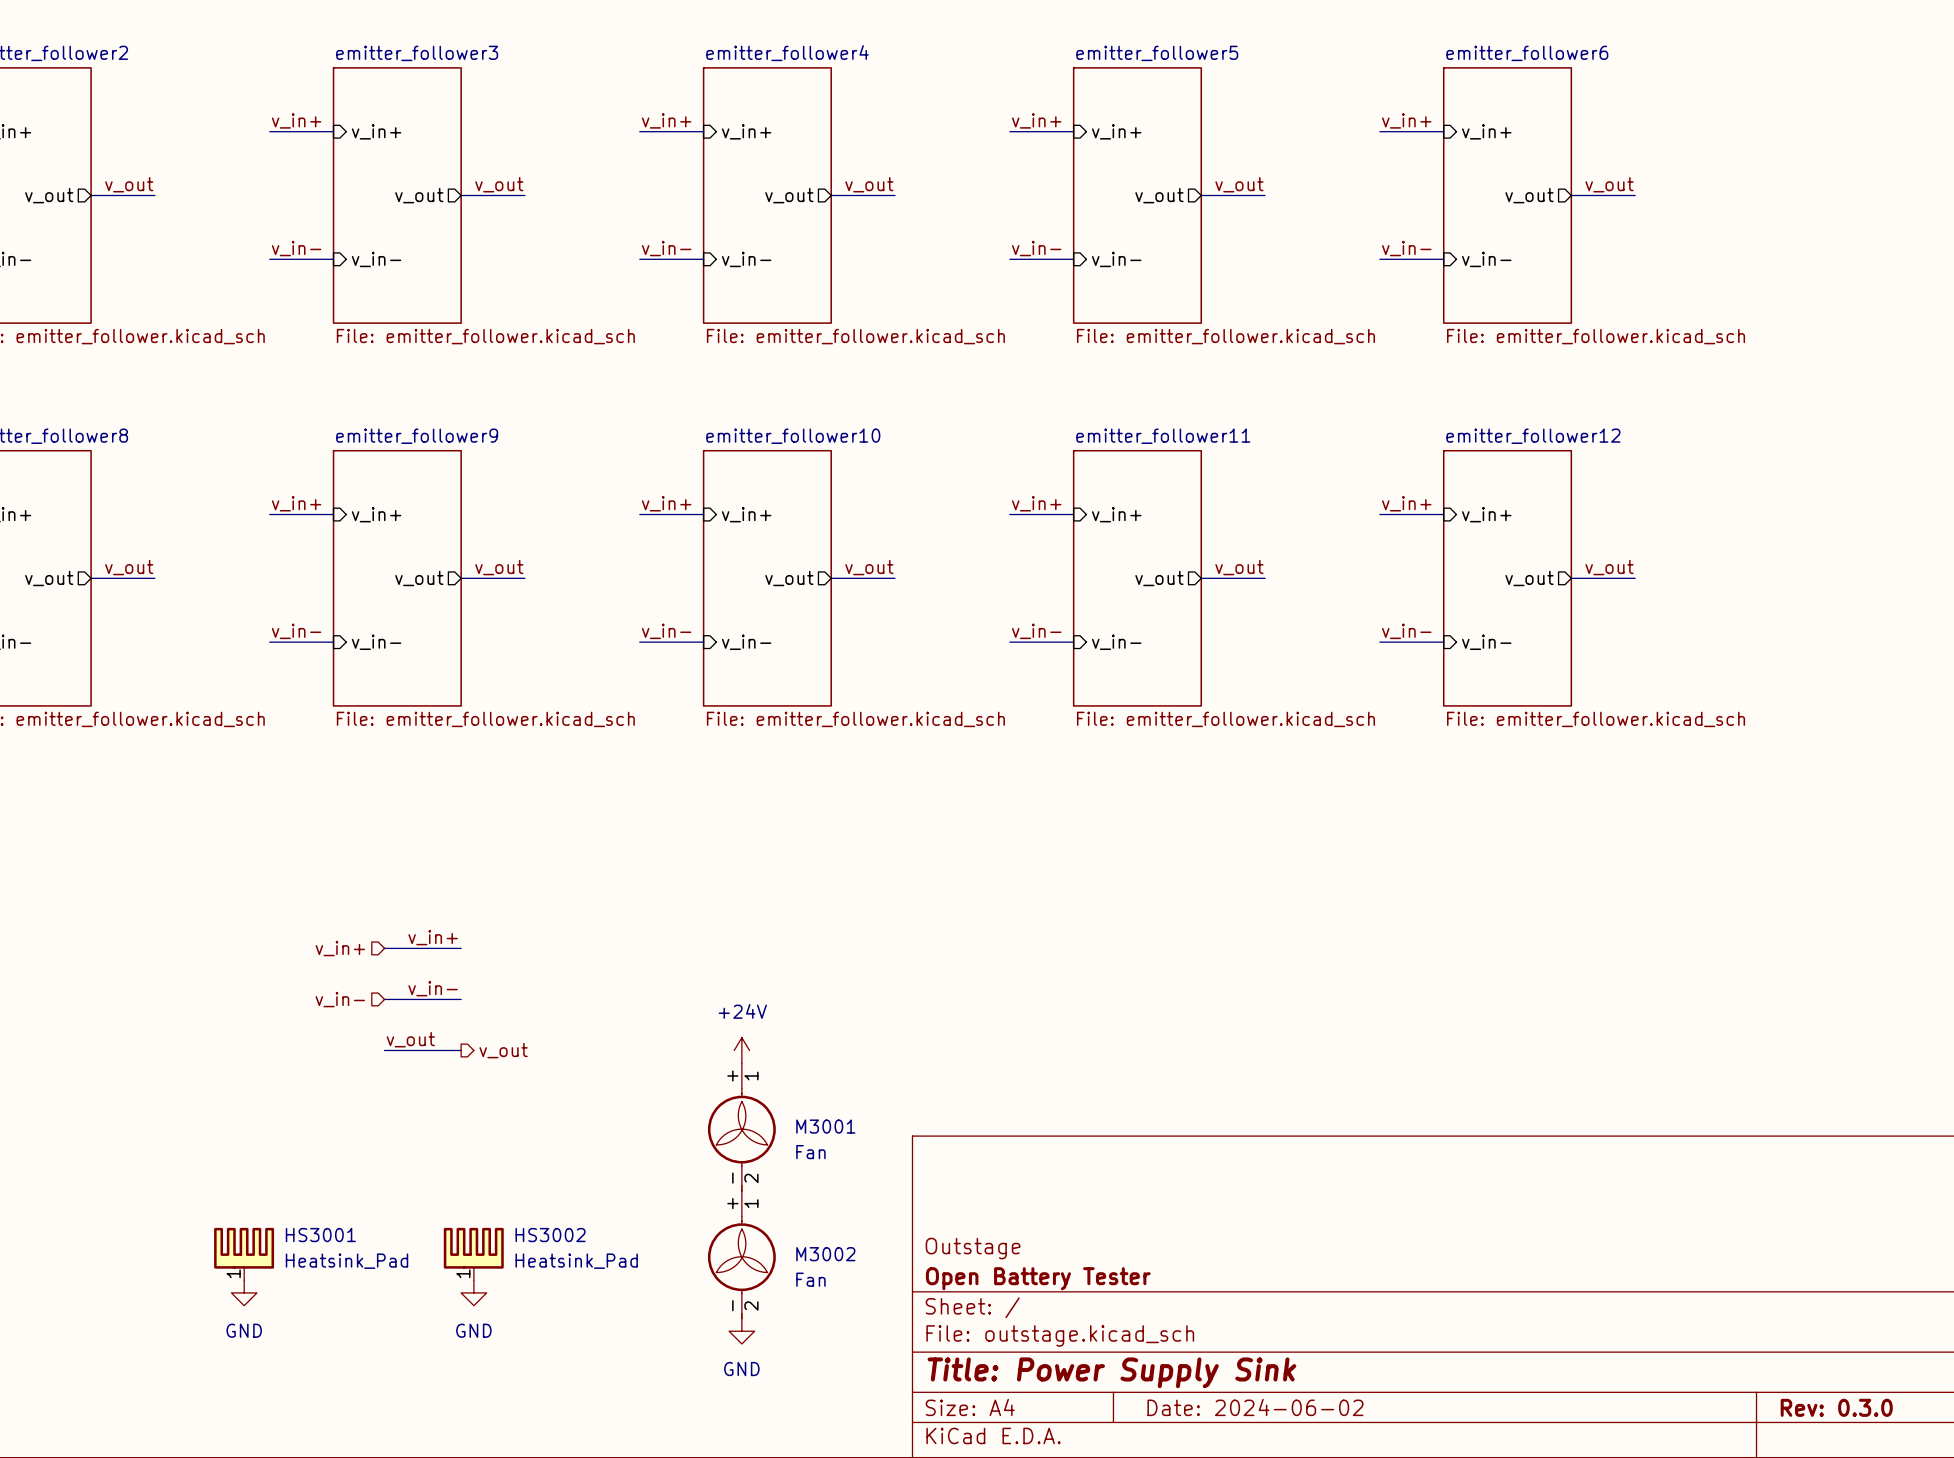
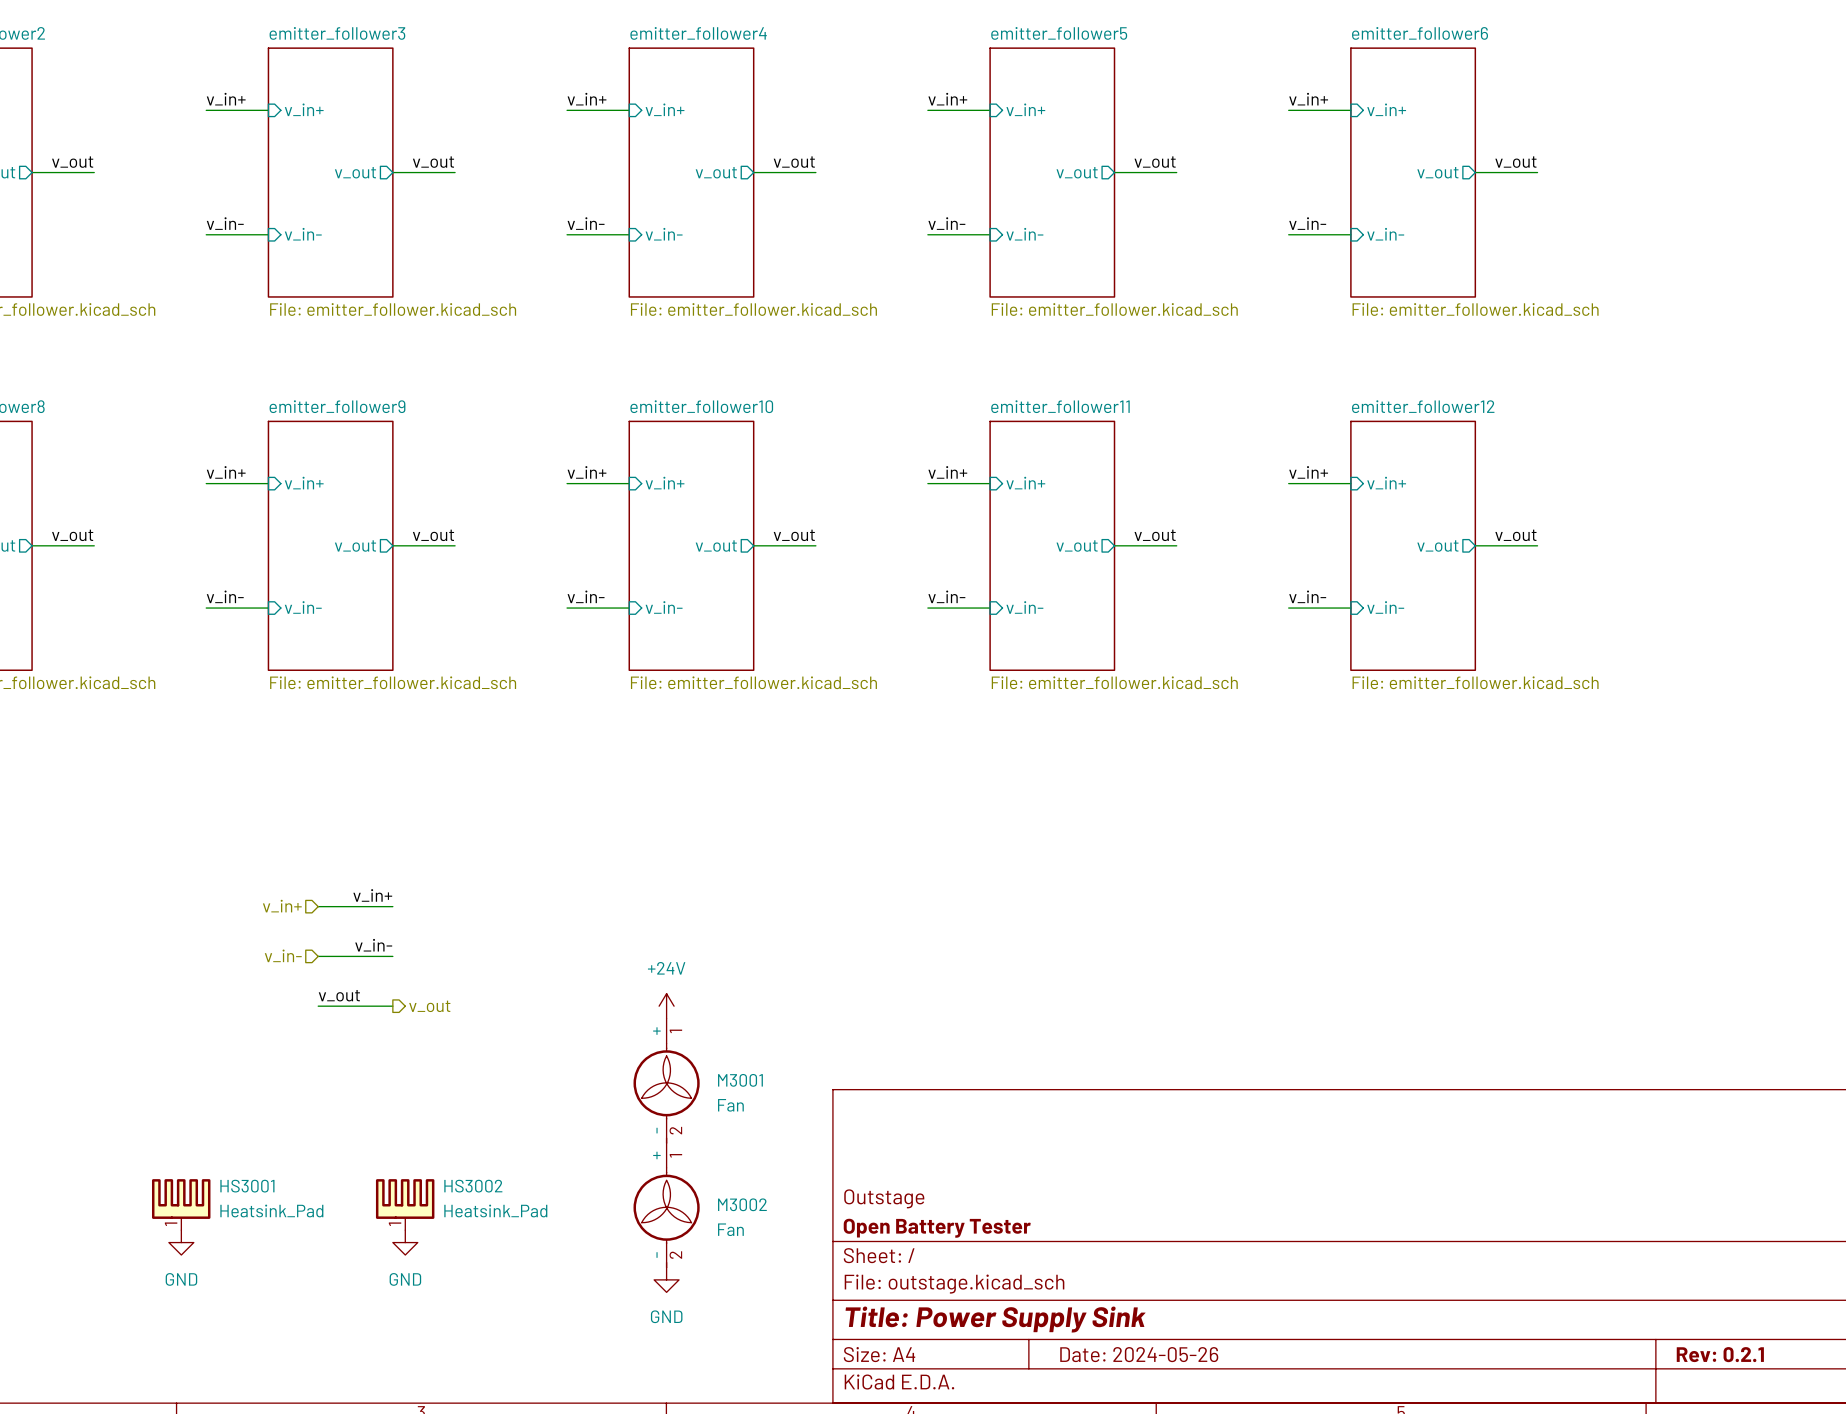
title block: Date: 2024-06-02 (1255, 1407) -> Date: 2024-05-26 (1139, 1354)
title block: Rev: 0.3.0 (1836, 1407) -> Rev: 0.2.1 (1720, 1354)

